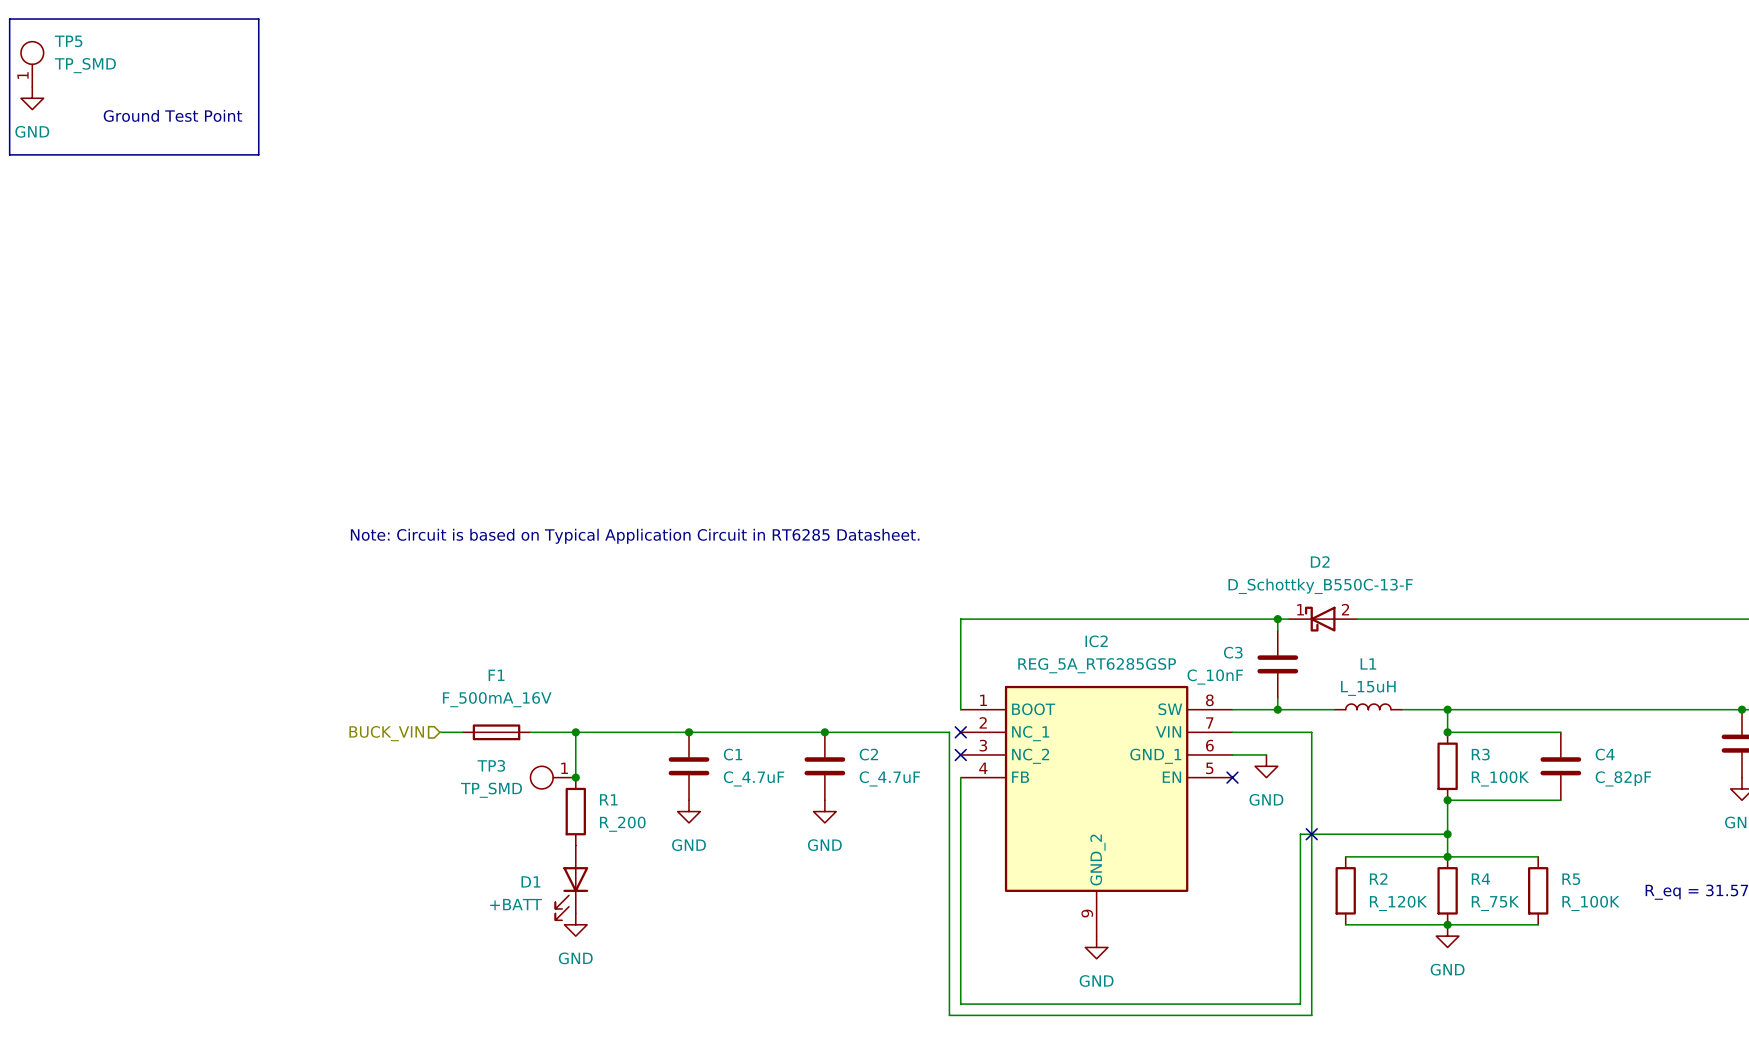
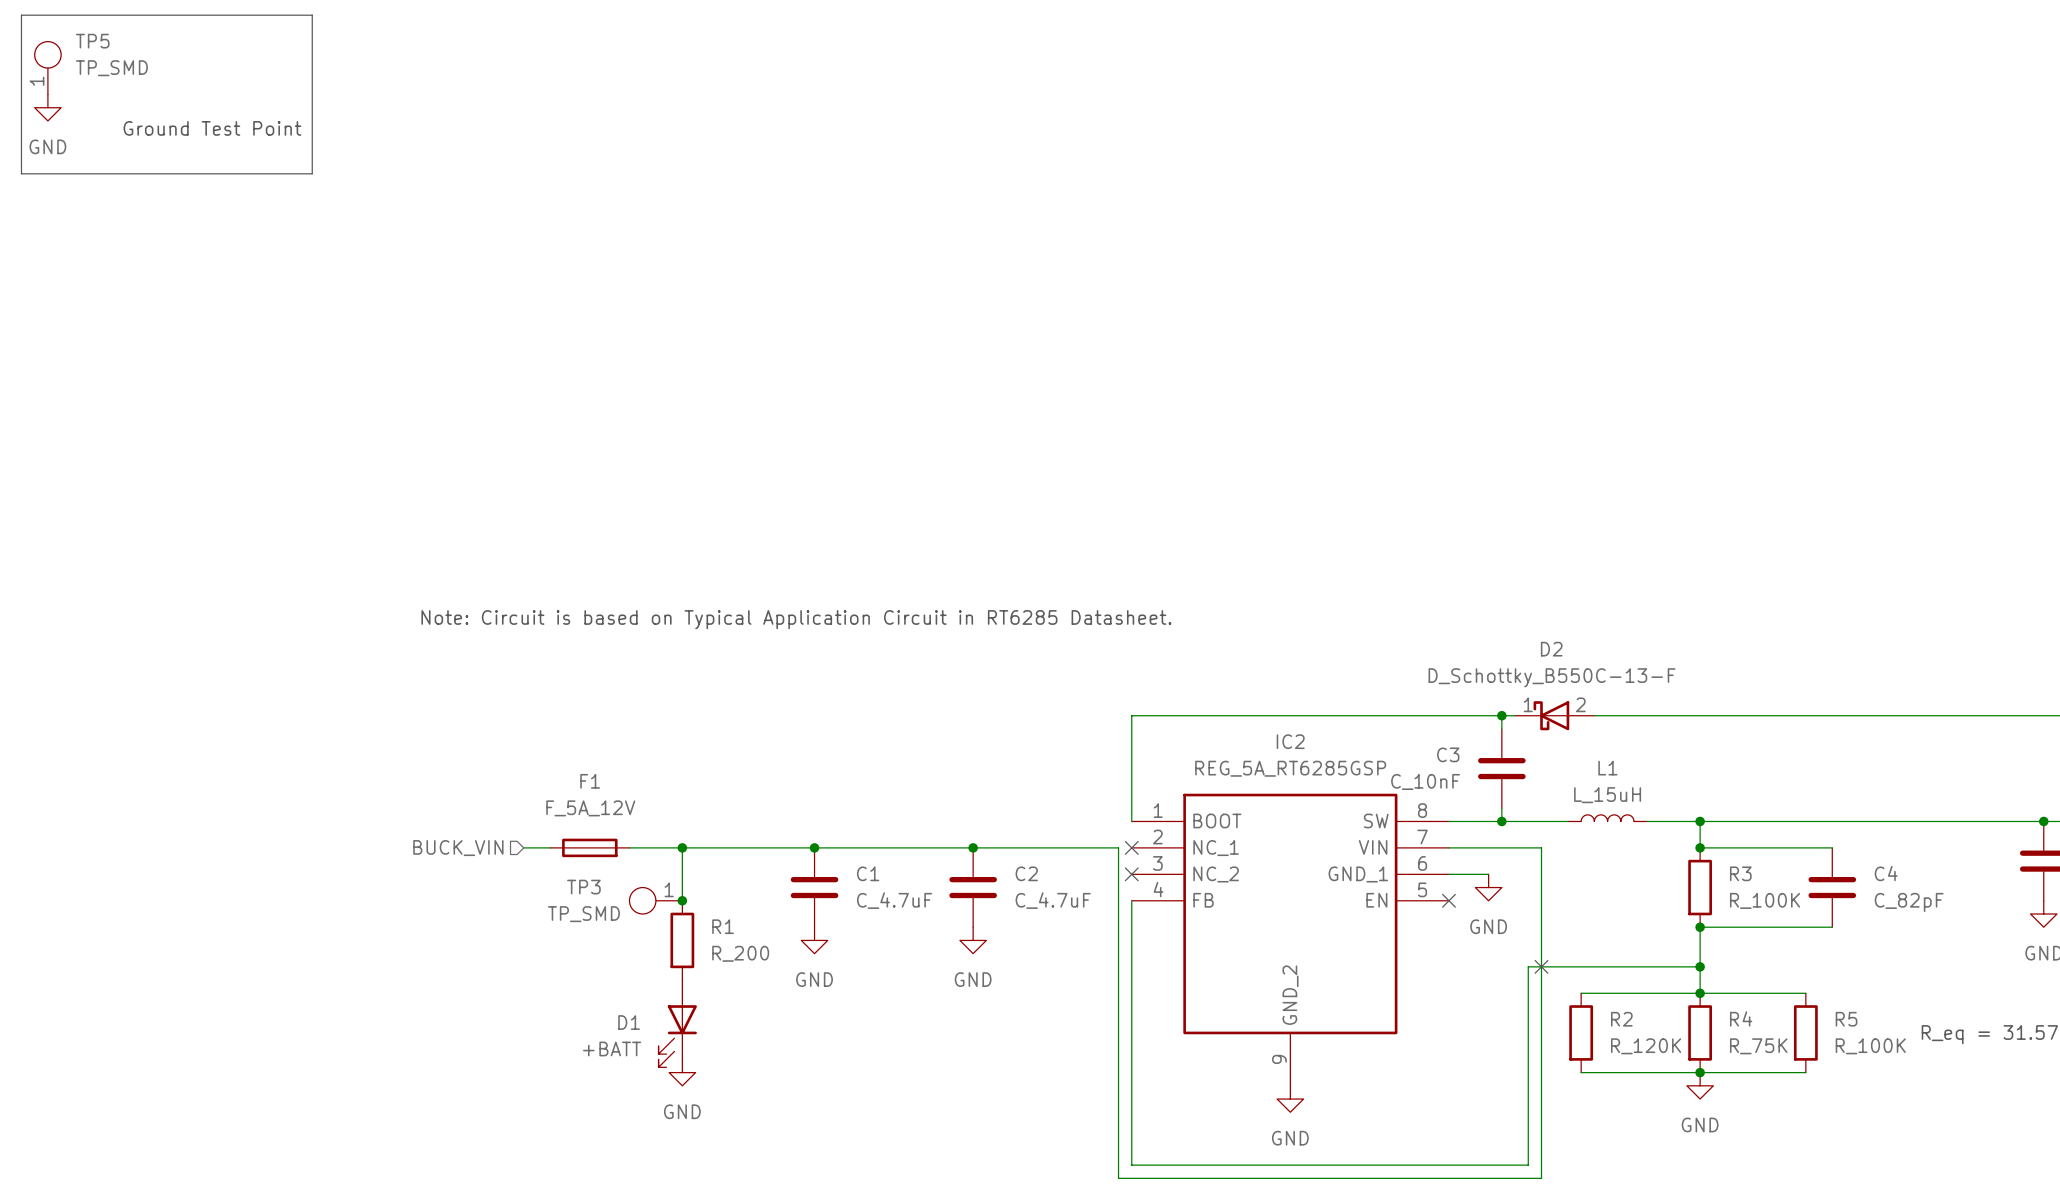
F1 value: F_500mA_16V (497, 699) -> F_5A_12V (590, 808)

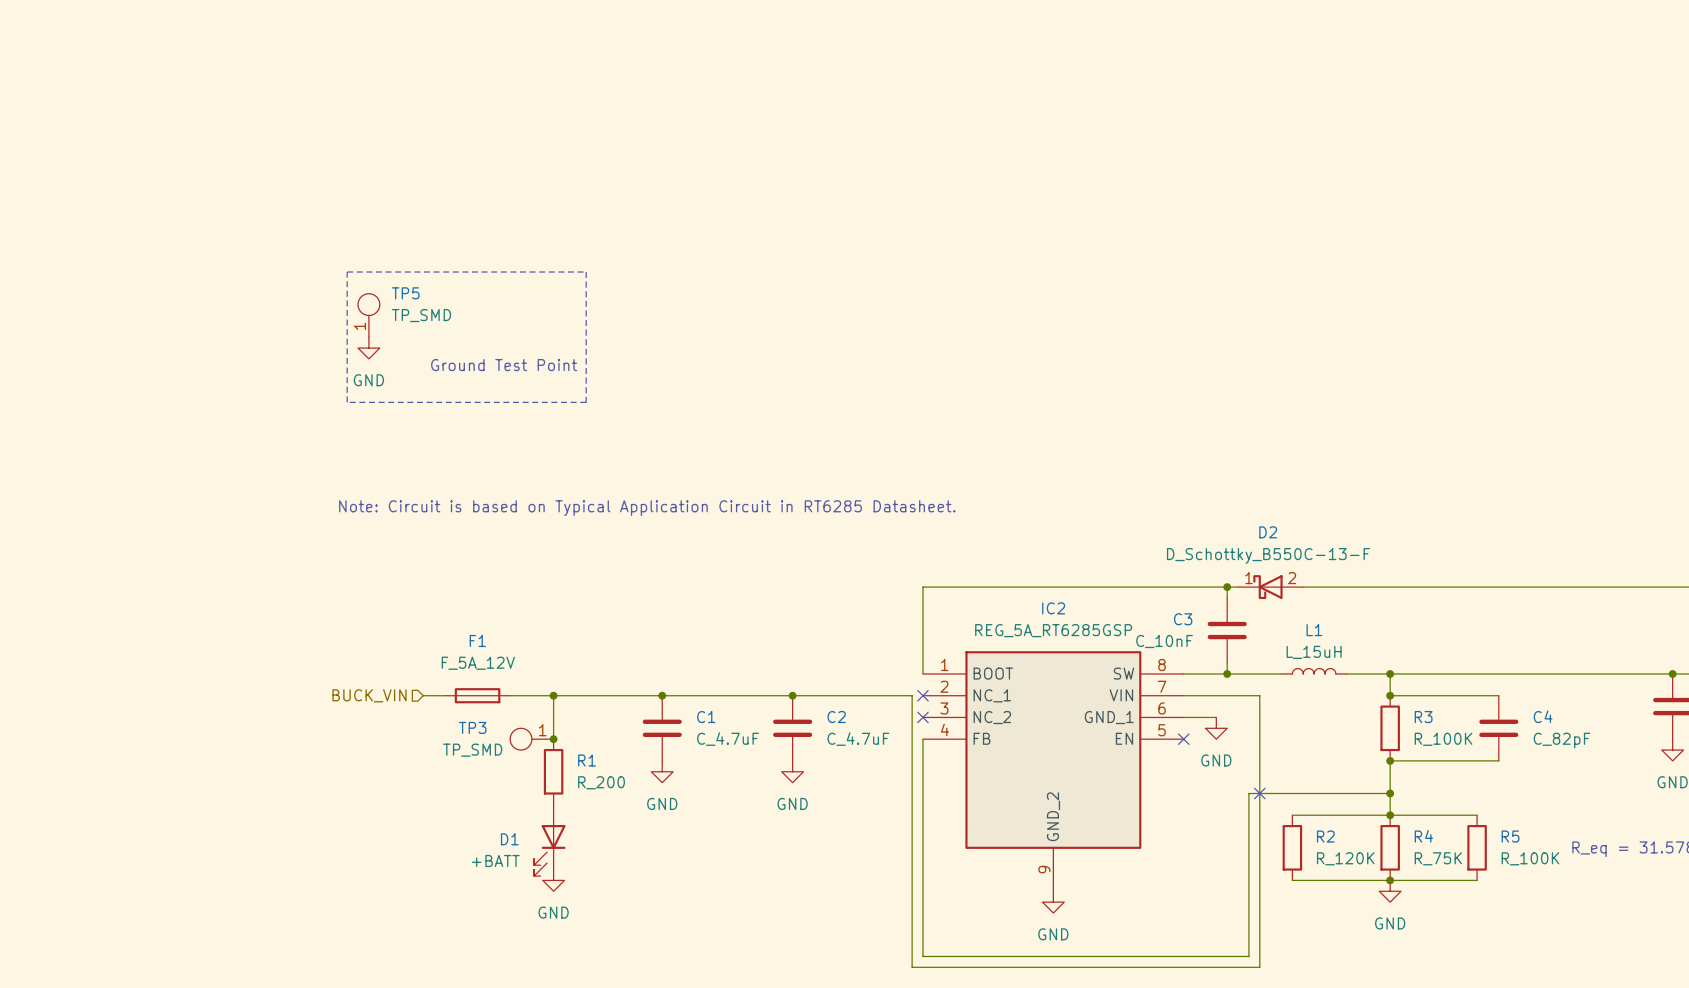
line: (21, 15) (312, 15) (312, 173) (21, 173) (21, 15) -> none
TP5 position: (47, 68) -> (368, 315)
power symbol: GND (47, 107) -> none
text: Ground Test Point (212, 128) -> none
line: none -> (347, 272) (586, 272) (586, 402) (347, 402) (347, 272)
power symbol: none -> GND (368, 348)
text: none -> Ground Test Point (504, 365)

